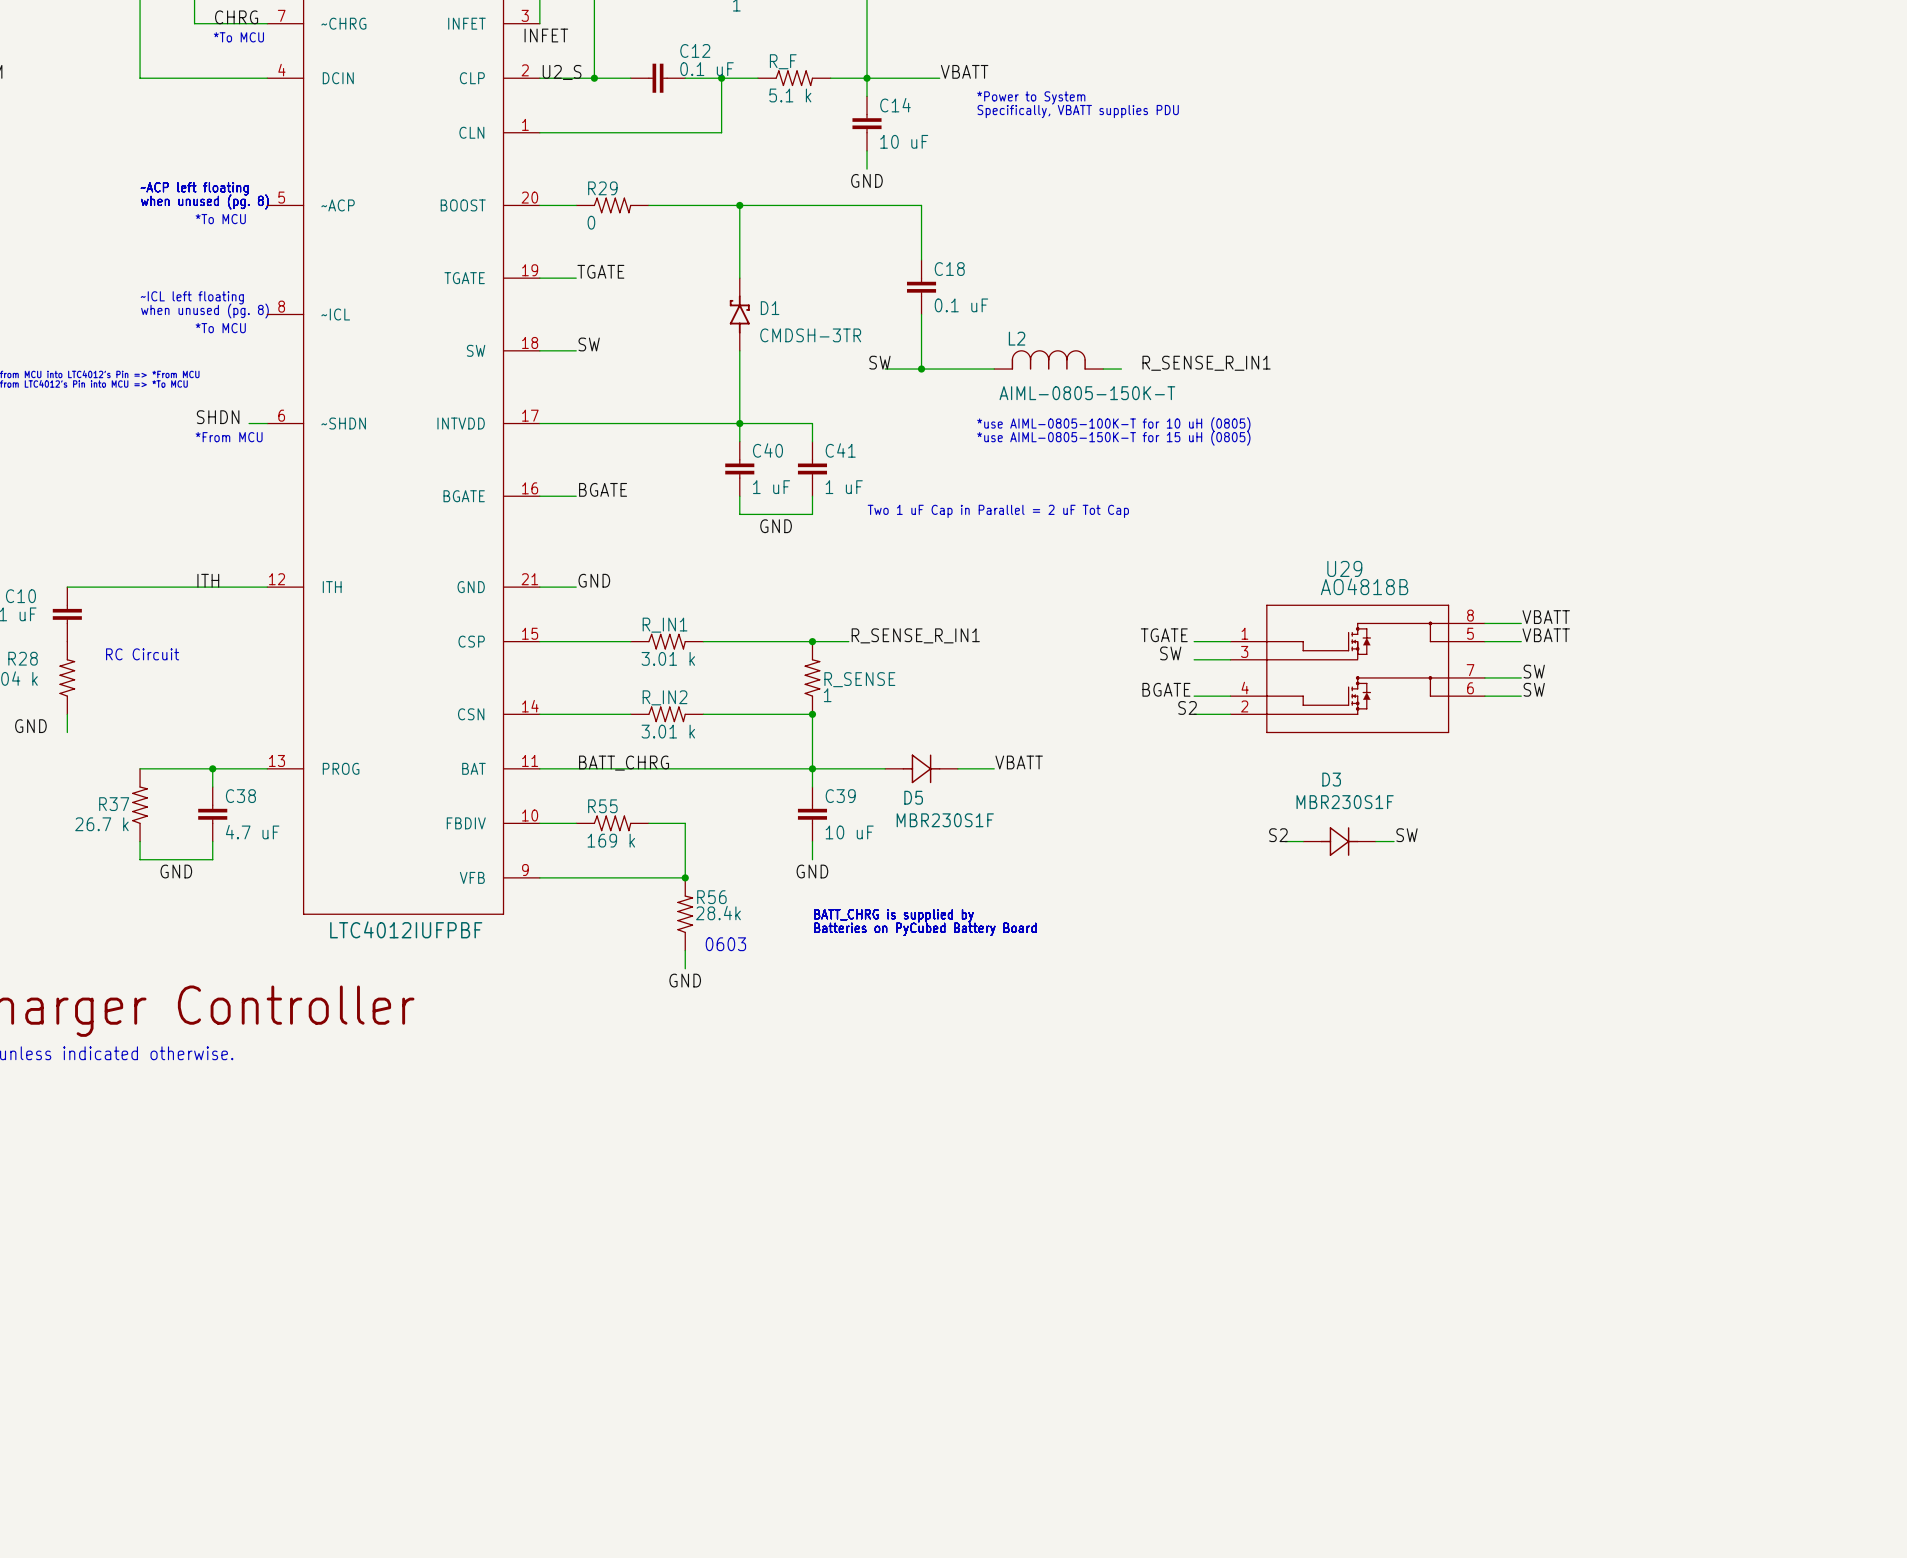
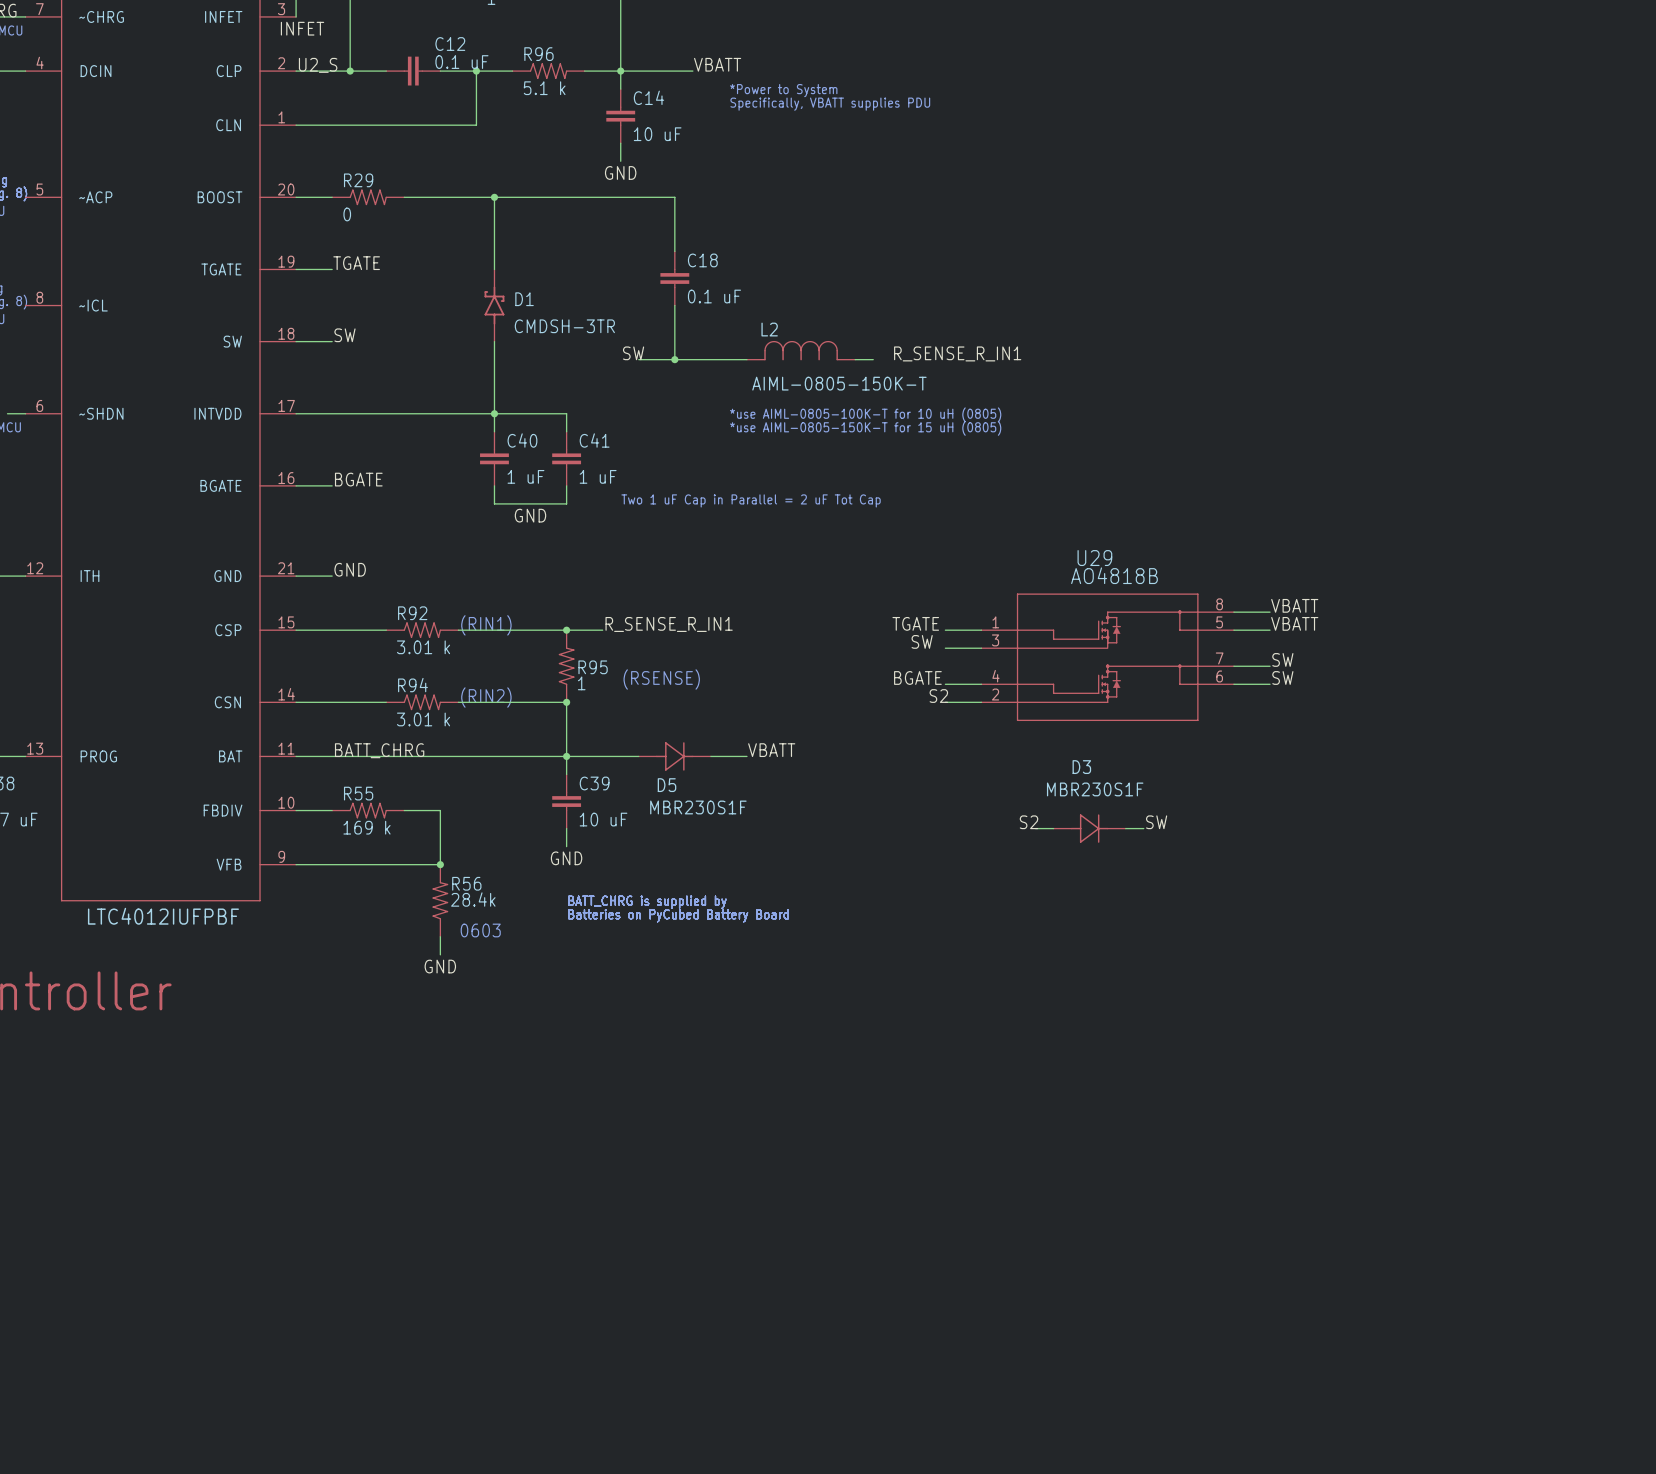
R_F name: R_F (783, 61) -> R96 (538, 54)
R_IN1 name: R_IN1 (665, 625) -> R92 (412, 613)
text: none -> (RIN1) (486, 625)
R_SENSE name: R_SENSE (859, 679) -> R95 (593, 667)
text: none -> (RSENSE) (661, 679)
R_IN2 name: R_IN2 (665, 697) -> R94 (412, 685)
text: none -> (RIN2) (486, 697)

